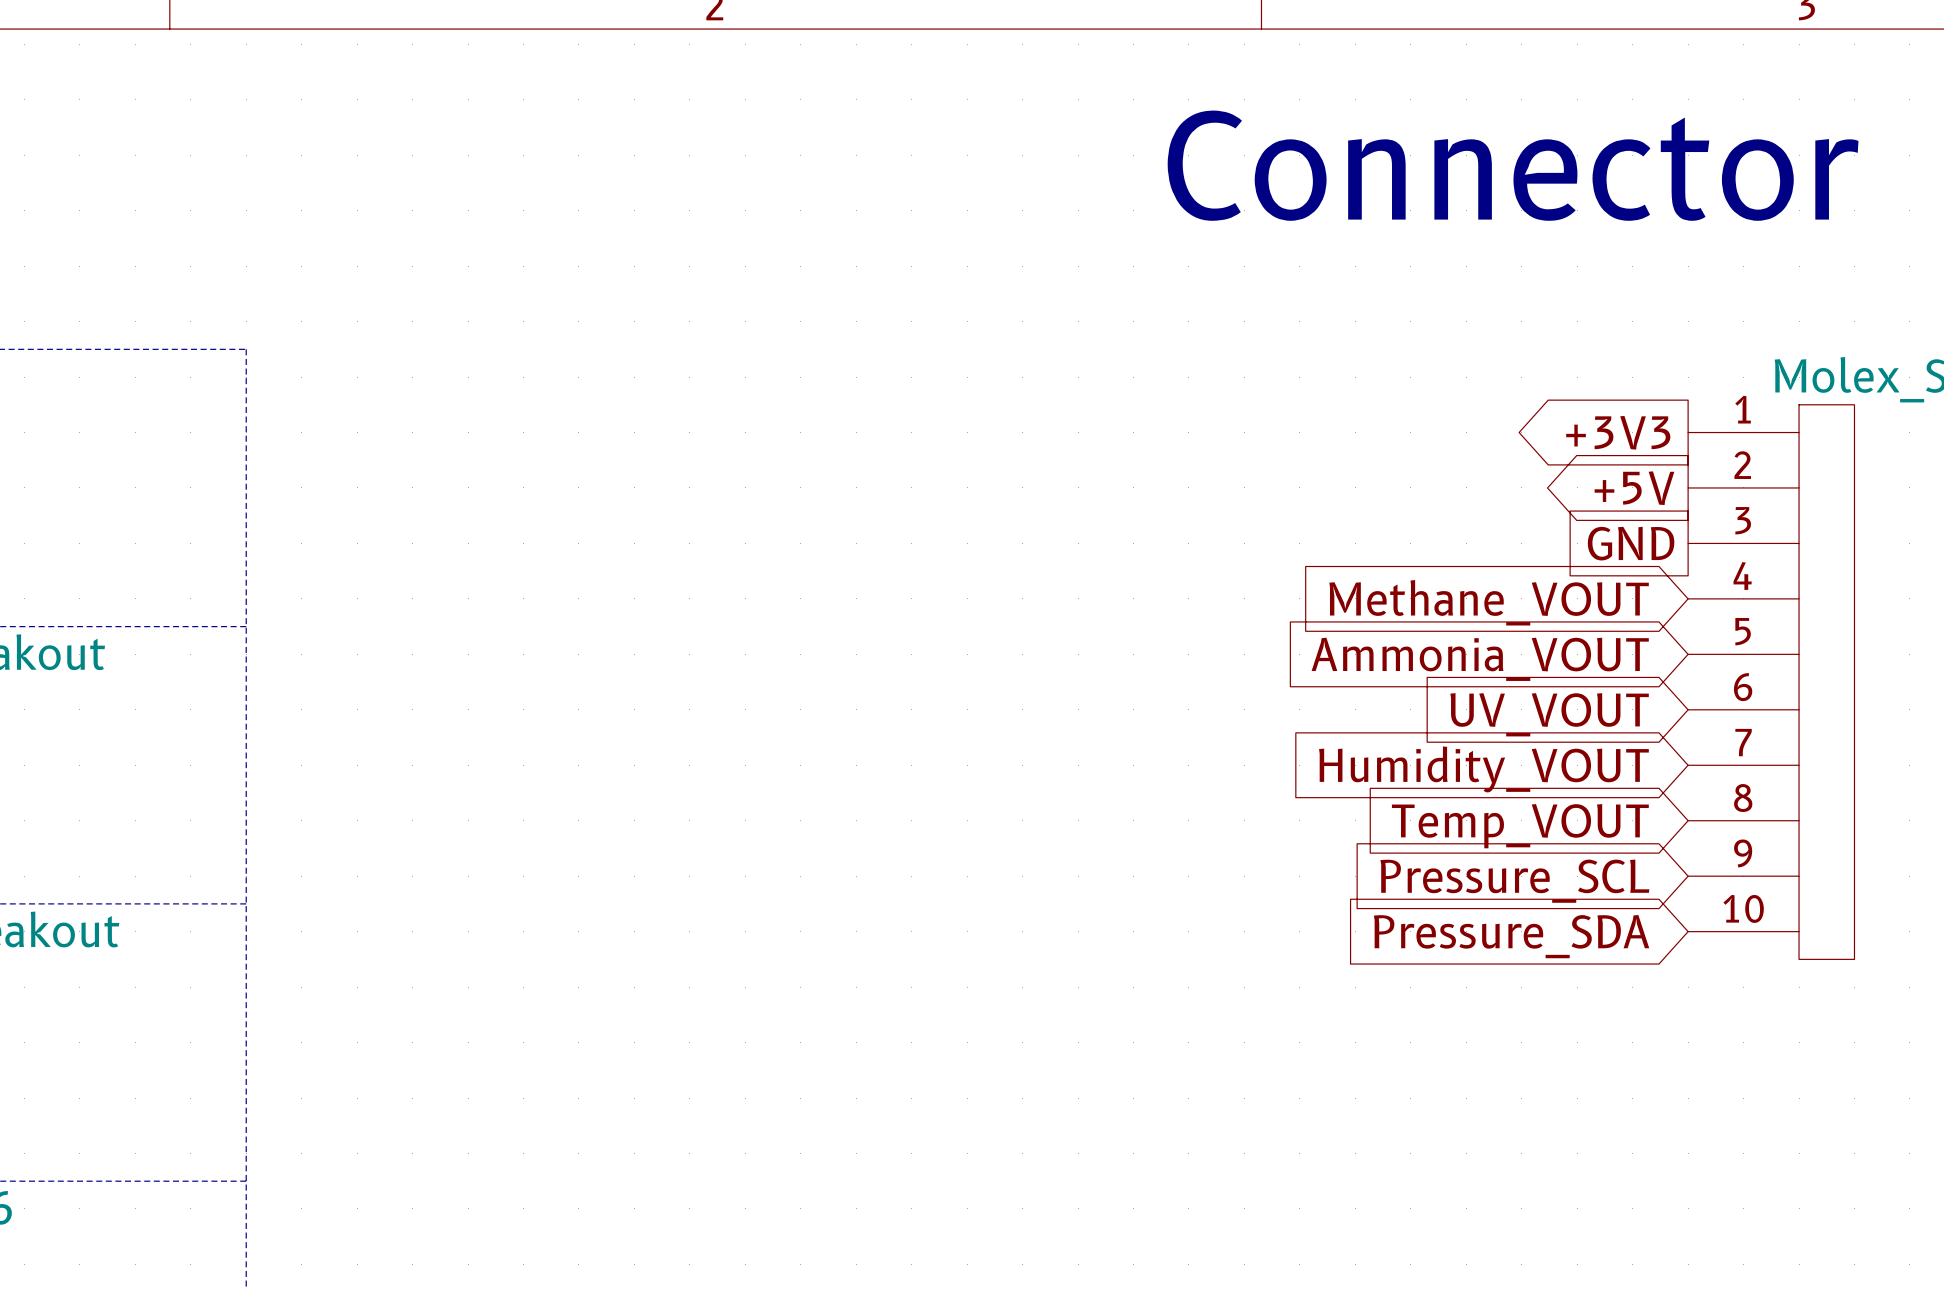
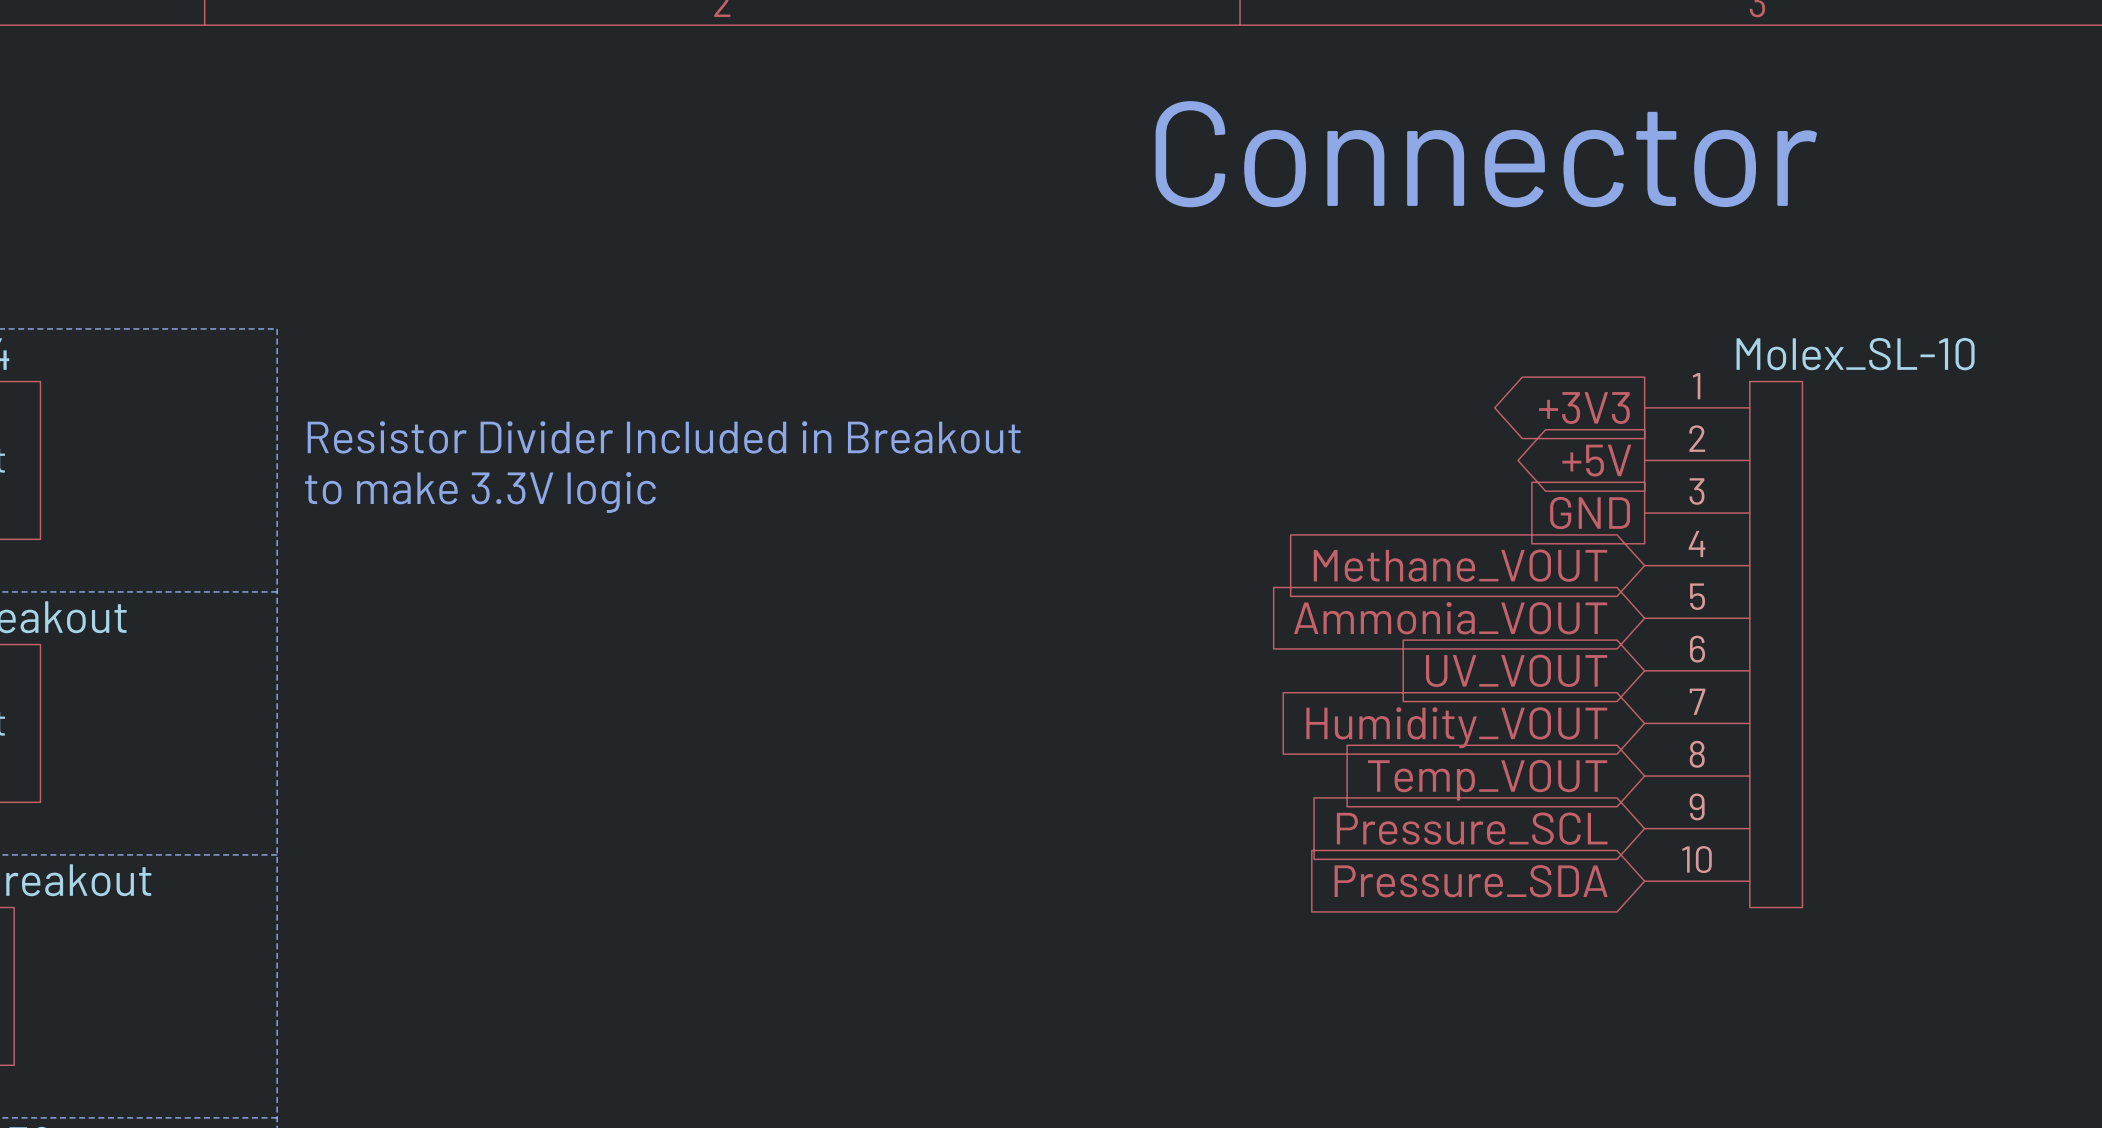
text: none -> Resistor Divider Included in Breakout (664, 437)
text: none -> to make 3.3V logic (480, 492)

